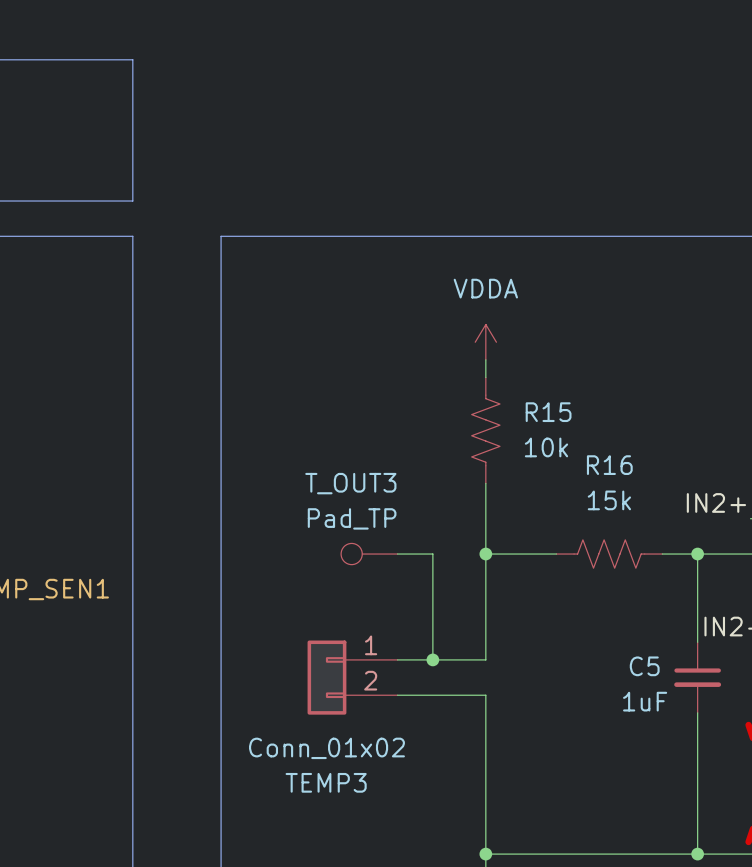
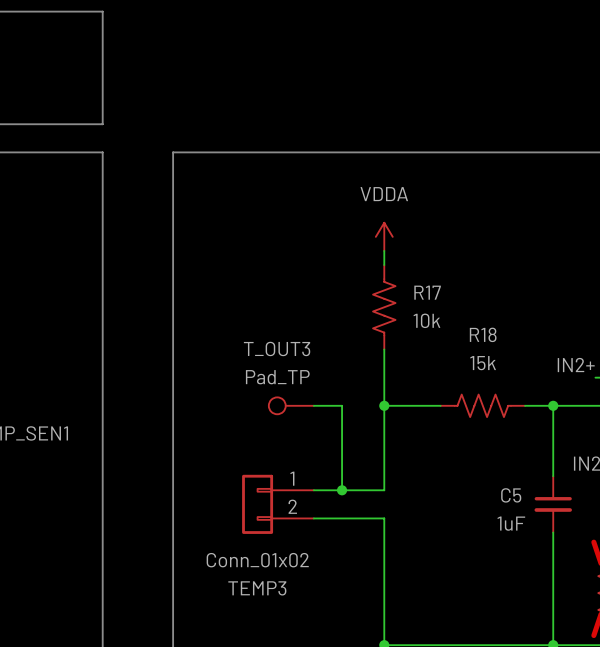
R15 name: R15 (548, 412) -> R17 (427, 292)
R16 name: R16 (609, 465) -> R18 (483, 334)

